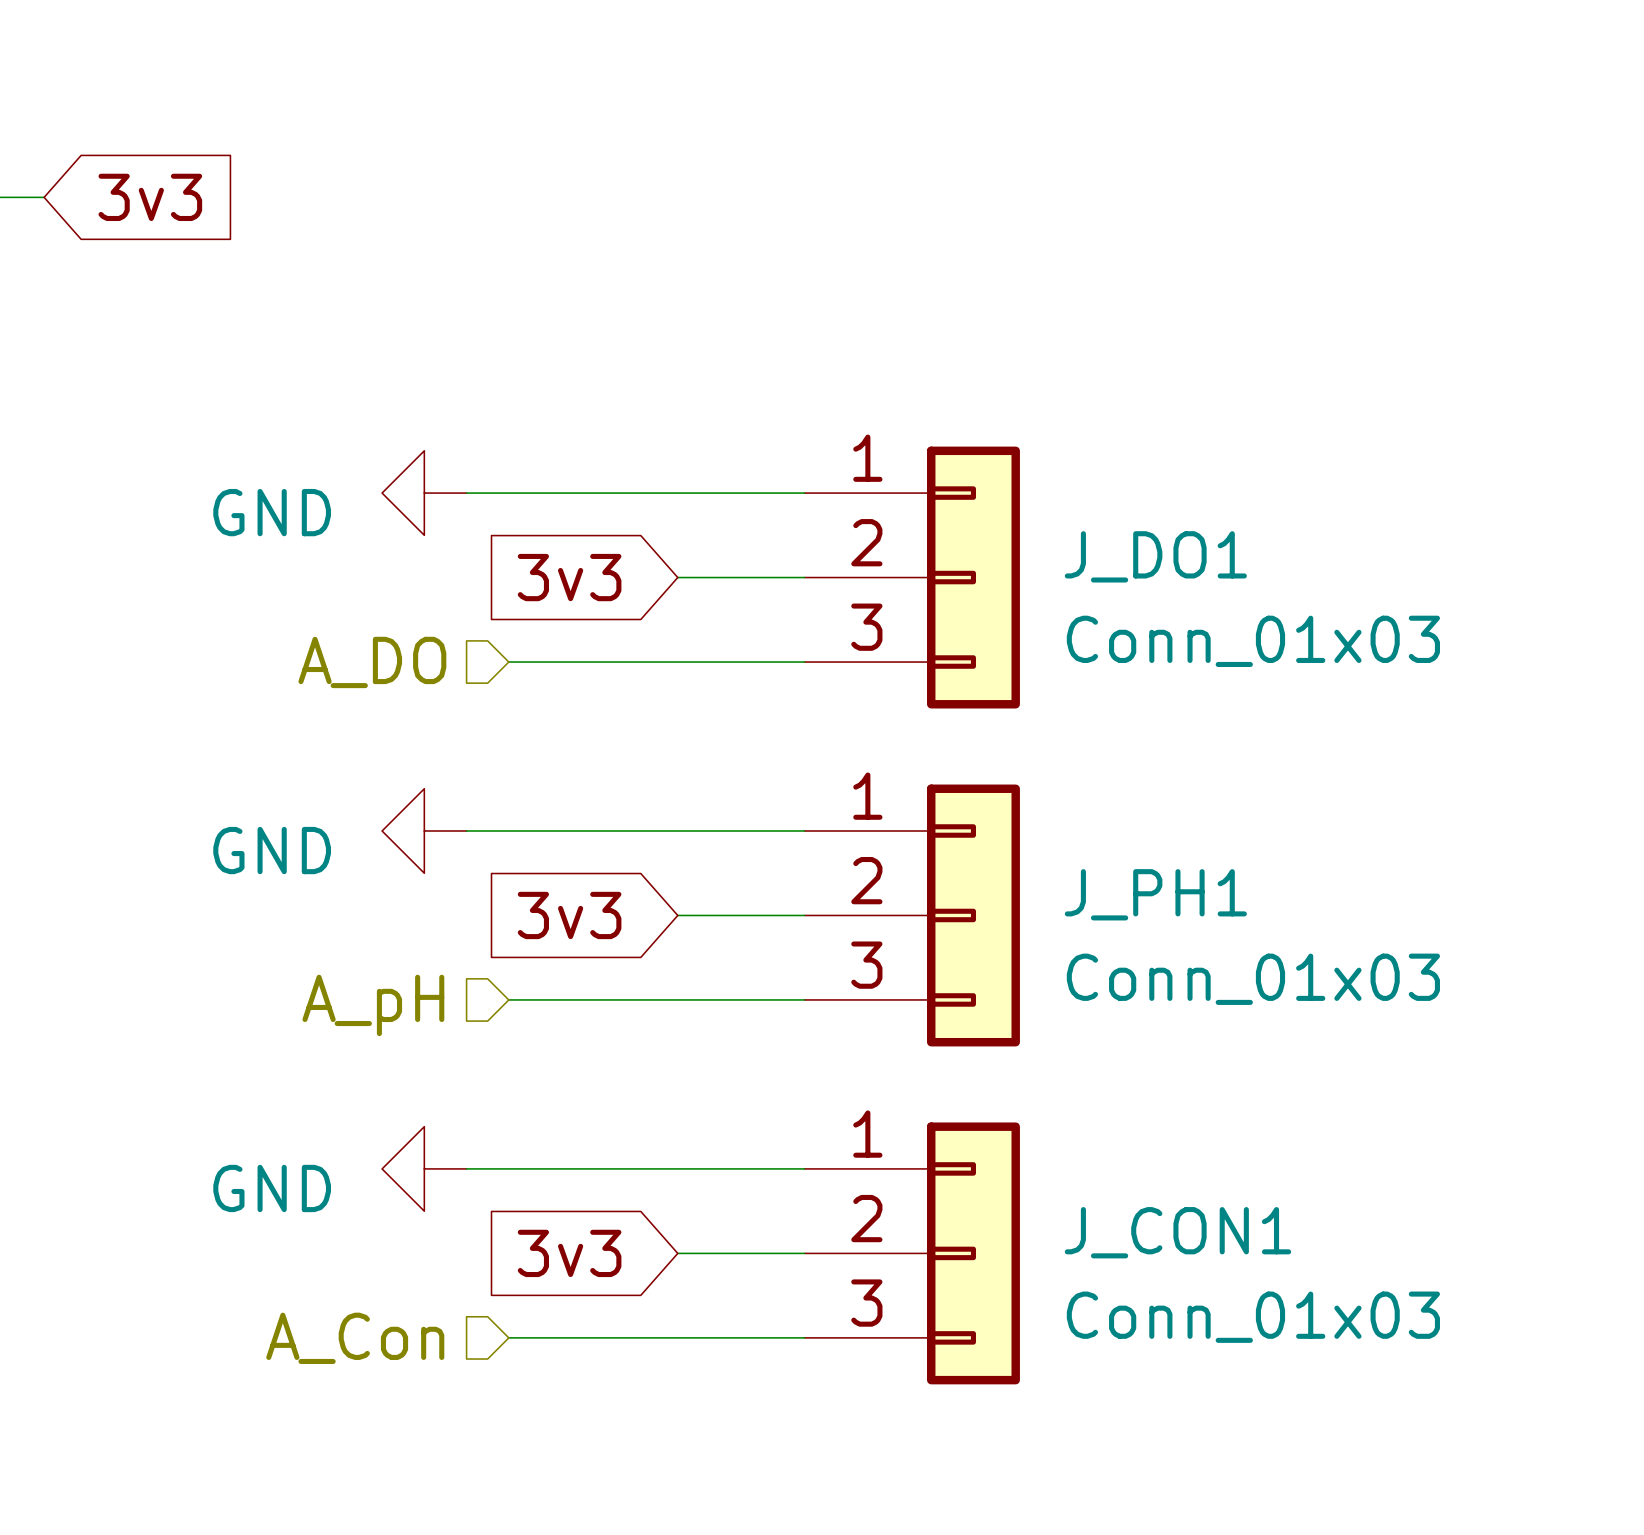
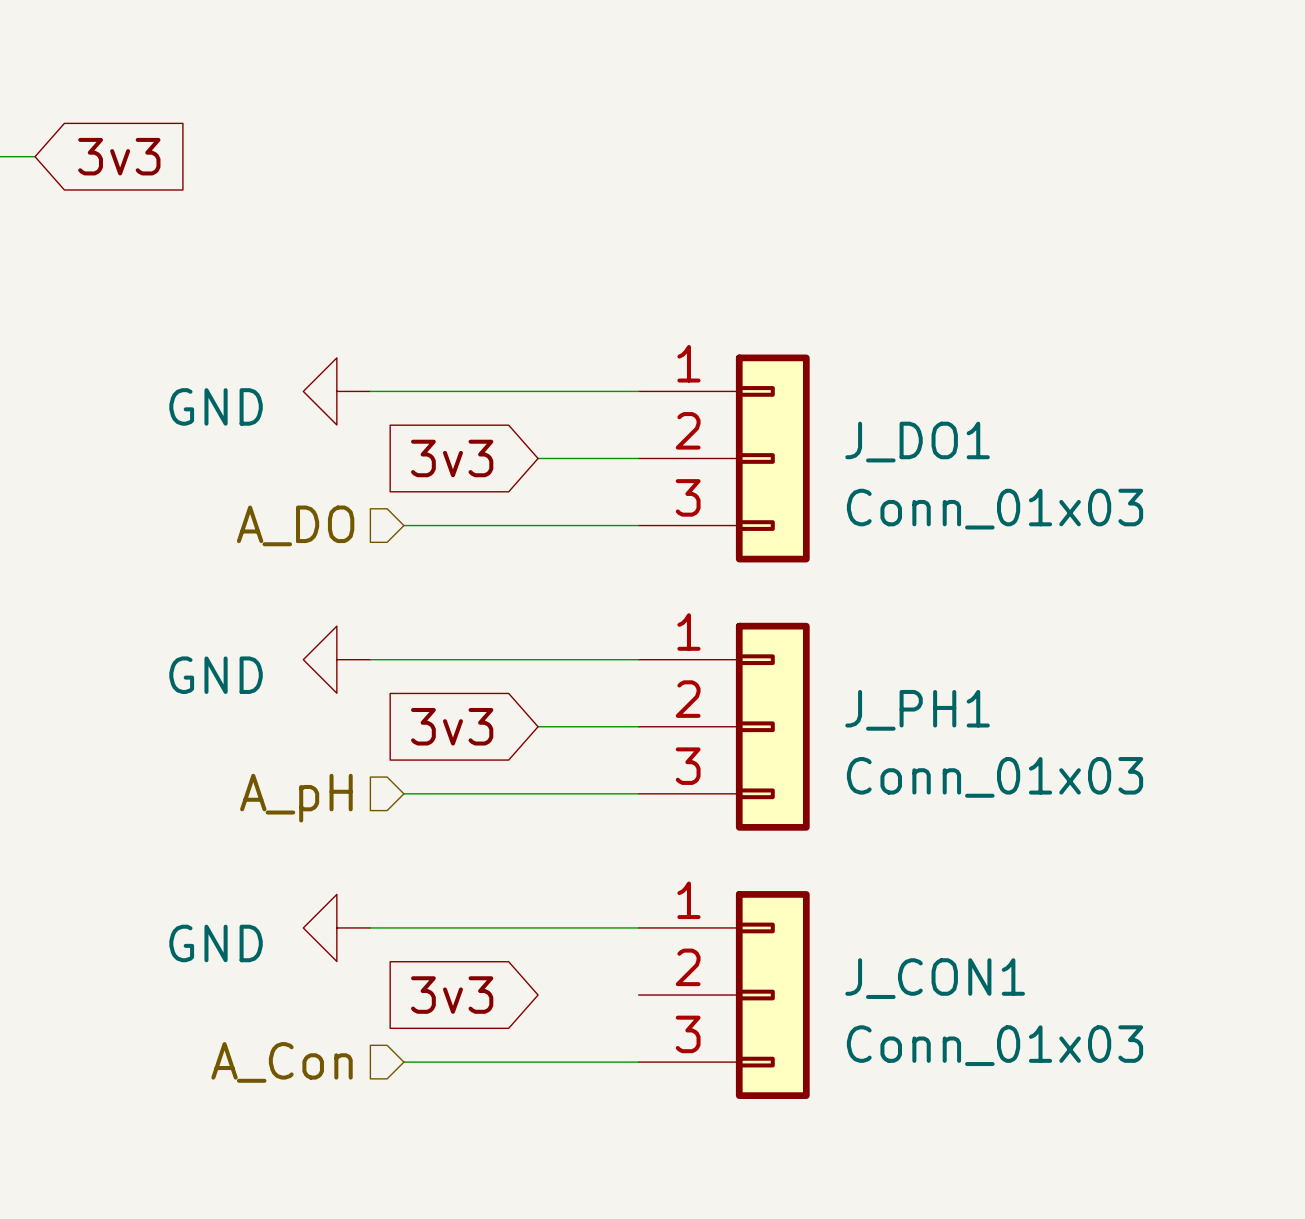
wire: (677, 1253) (804, 1253) -> none

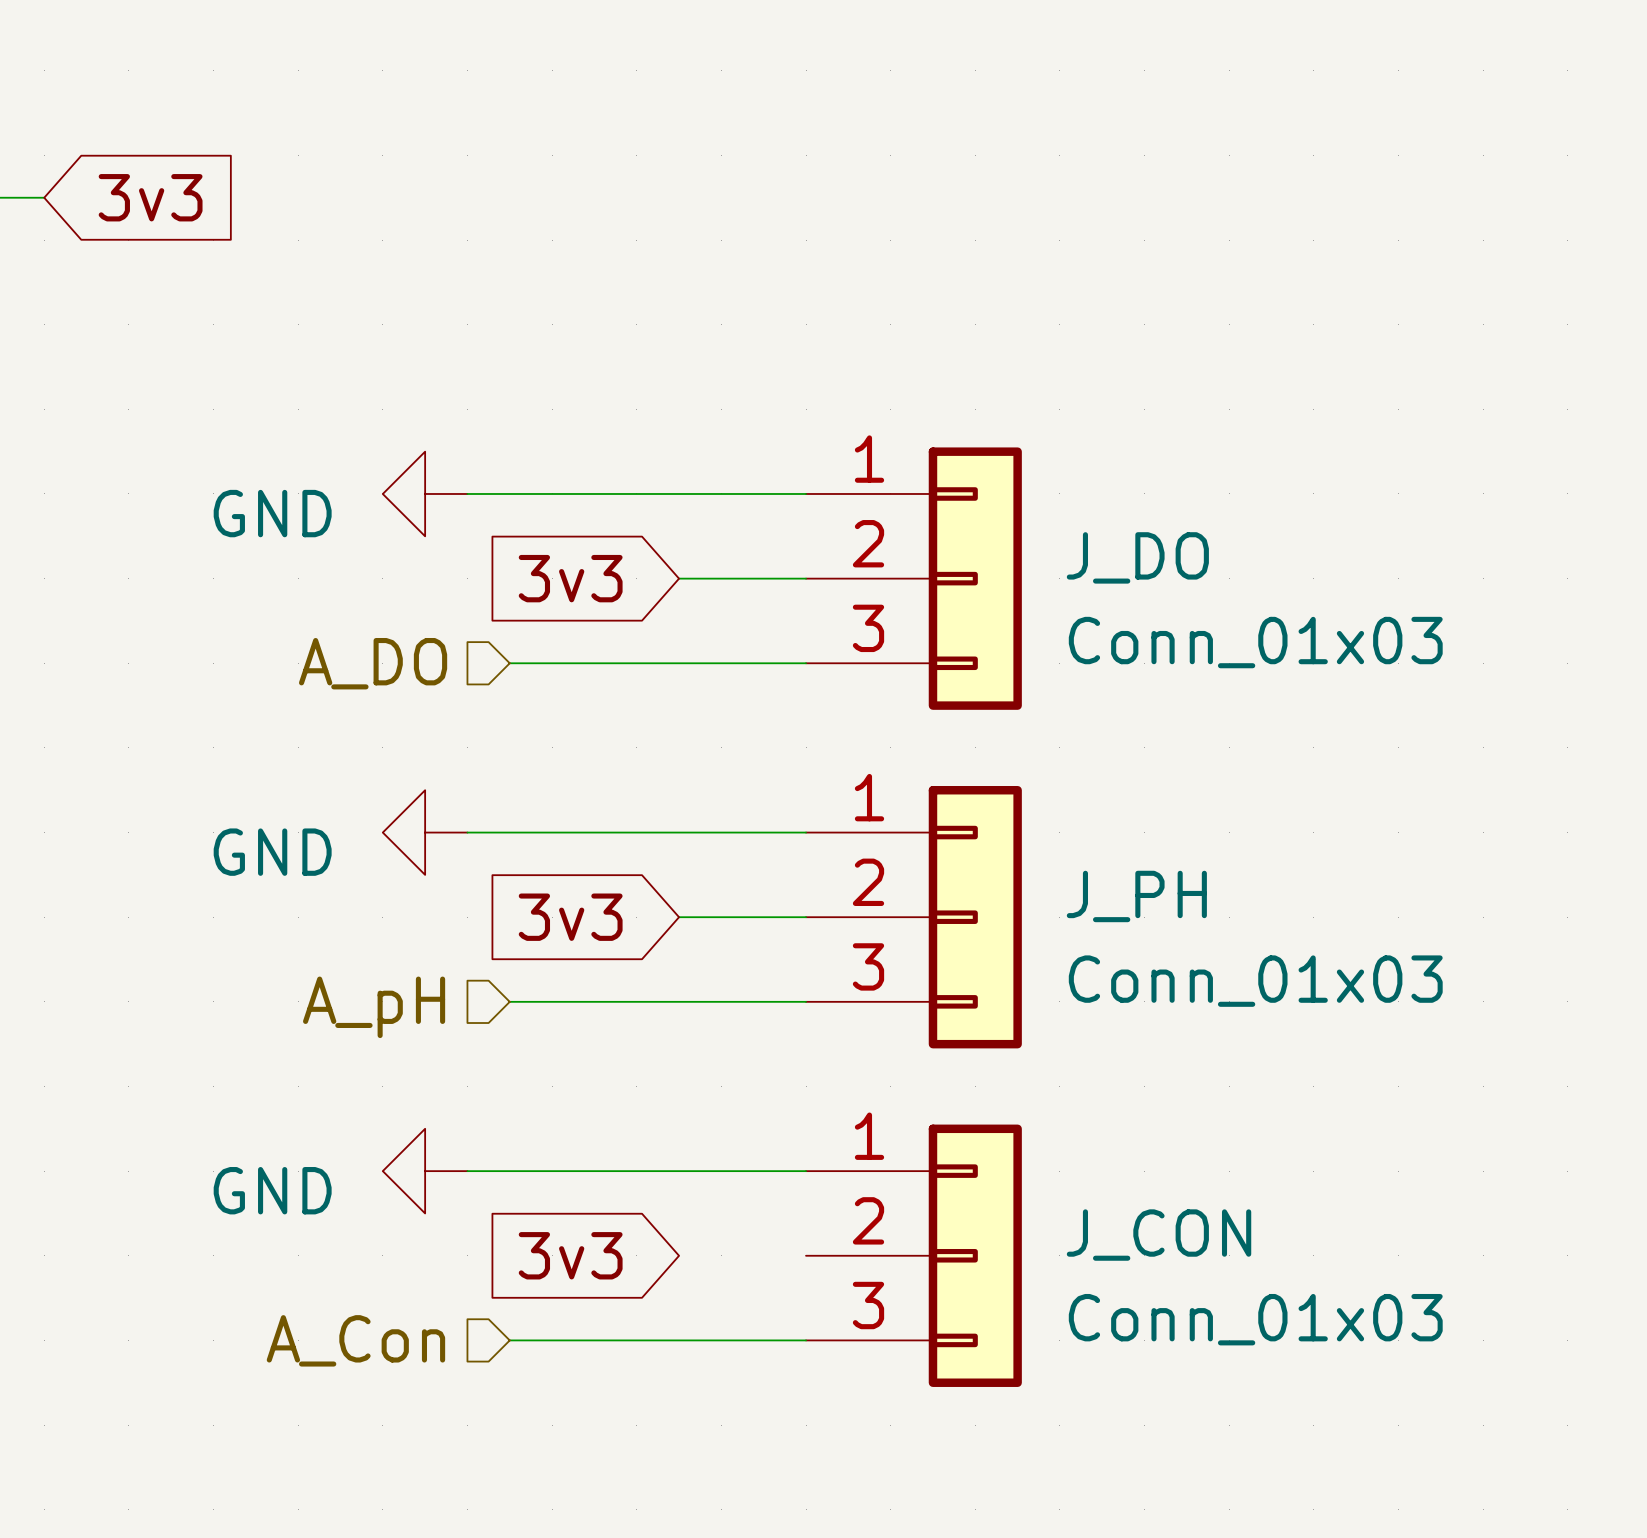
J_DO1 name: J_DO1 (917, 442) -> J_DO (1137, 557)
J_PH1 name: J_PH1 (917, 710) -> J_PH (1136, 896)
J_CON1 name: J_CON1 (935, 978) -> J_CON (1159, 1235)

